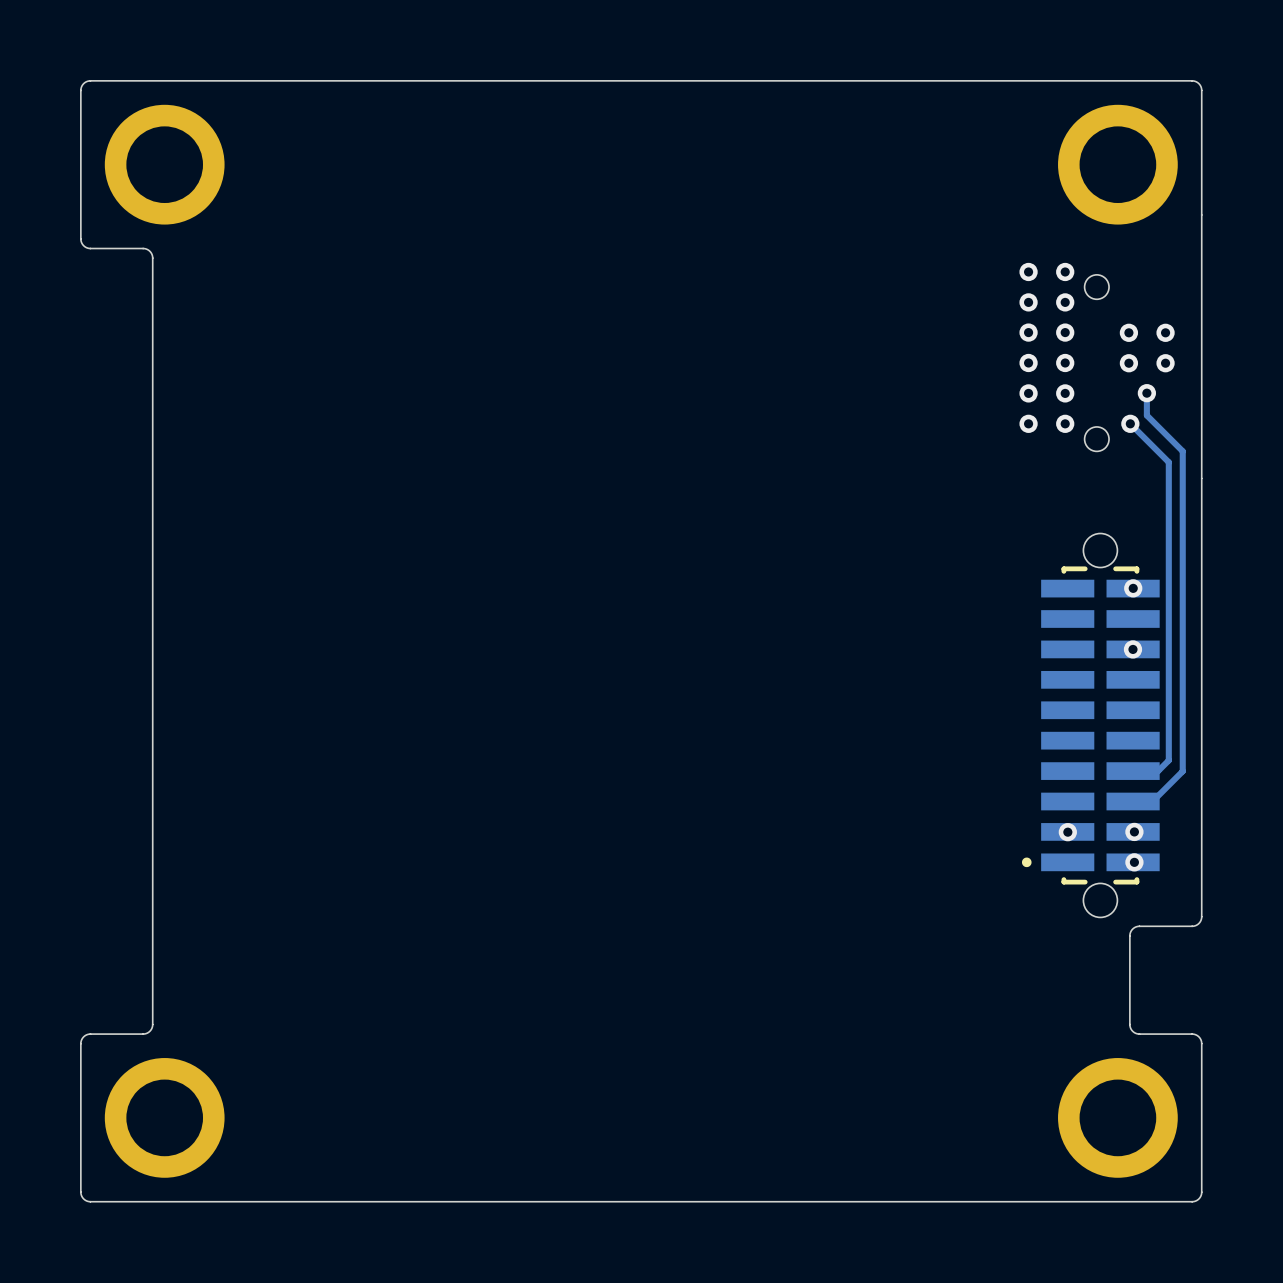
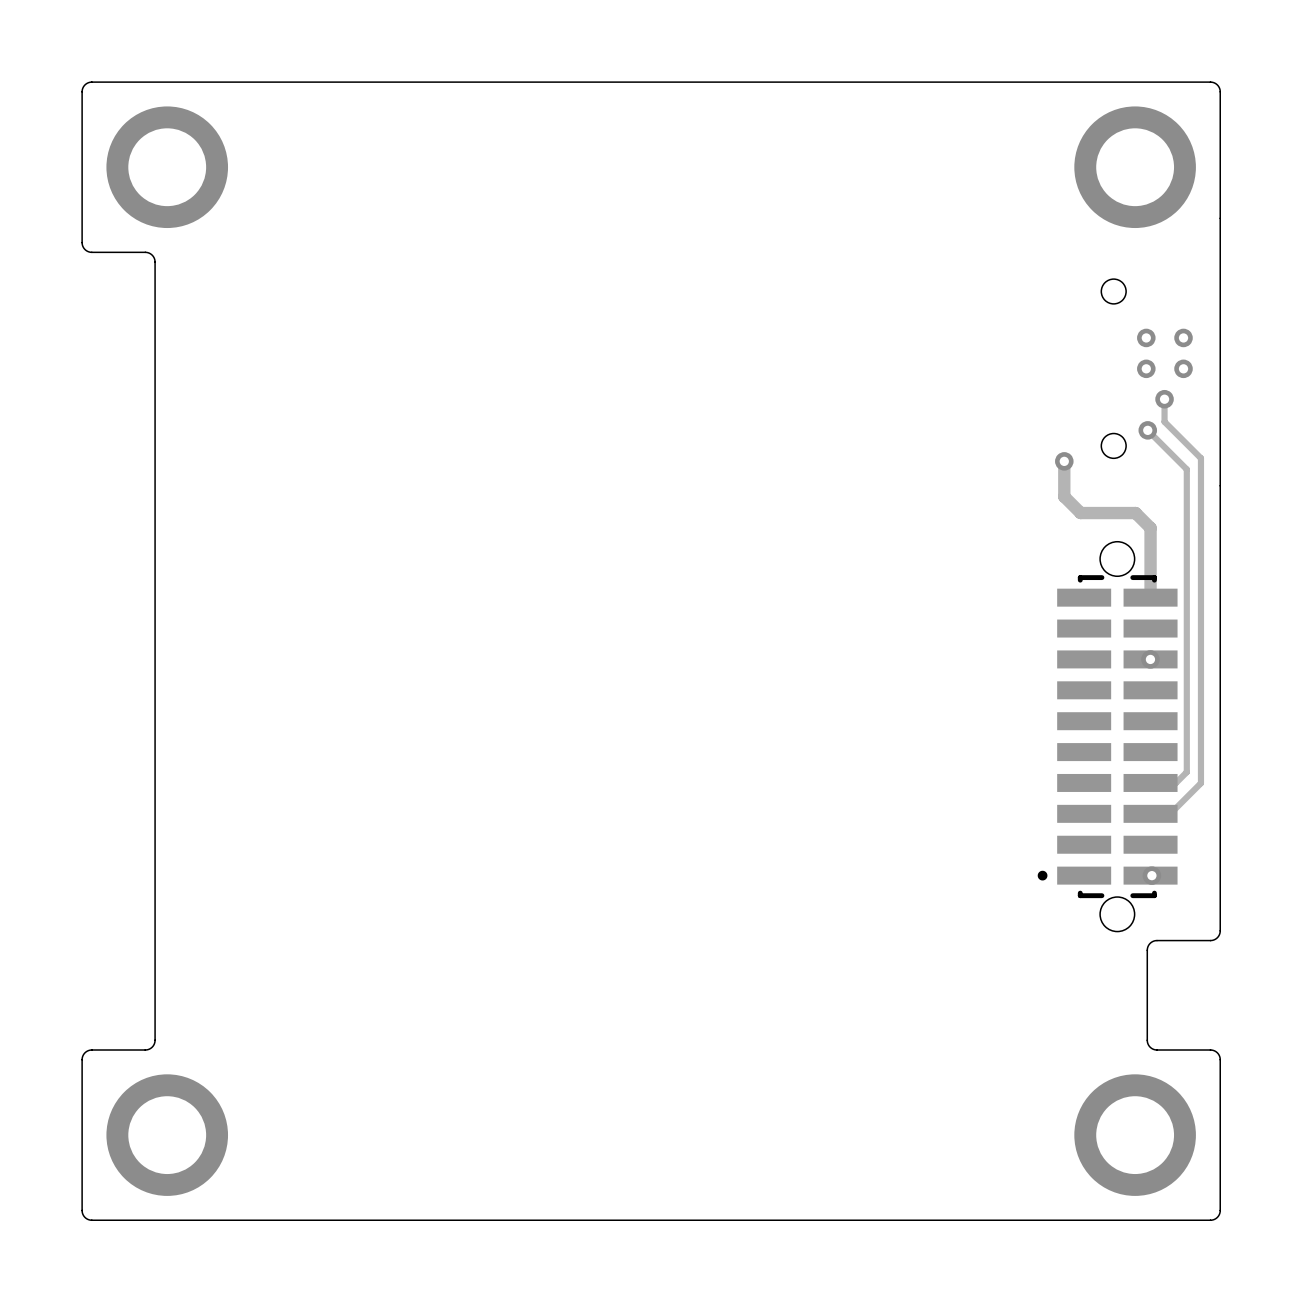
via: (1028, 271) -> none
via: (1065, 271) -> none
via: (1028, 302) -> none
via: (1065, 302) -> none
via: (1028, 332) -> none
via: (1065, 332) -> none
via: (1028, 362) -> none
via: (1065, 362) -> none
via: (1028, 393) -> none
via: (1065, 393) -> none
via: (1028, 423) -> none
via: (1065, 423) -> none
track: none -> (1064, 461) (1064, 496) (1080, 513) (1135, 513) (1150, 527) (1150, 597)
via: none -> (1064, 461)
via: (1133, 588) -> none
via: (1134, 831) -> none
via: (1067, 832) -> none

